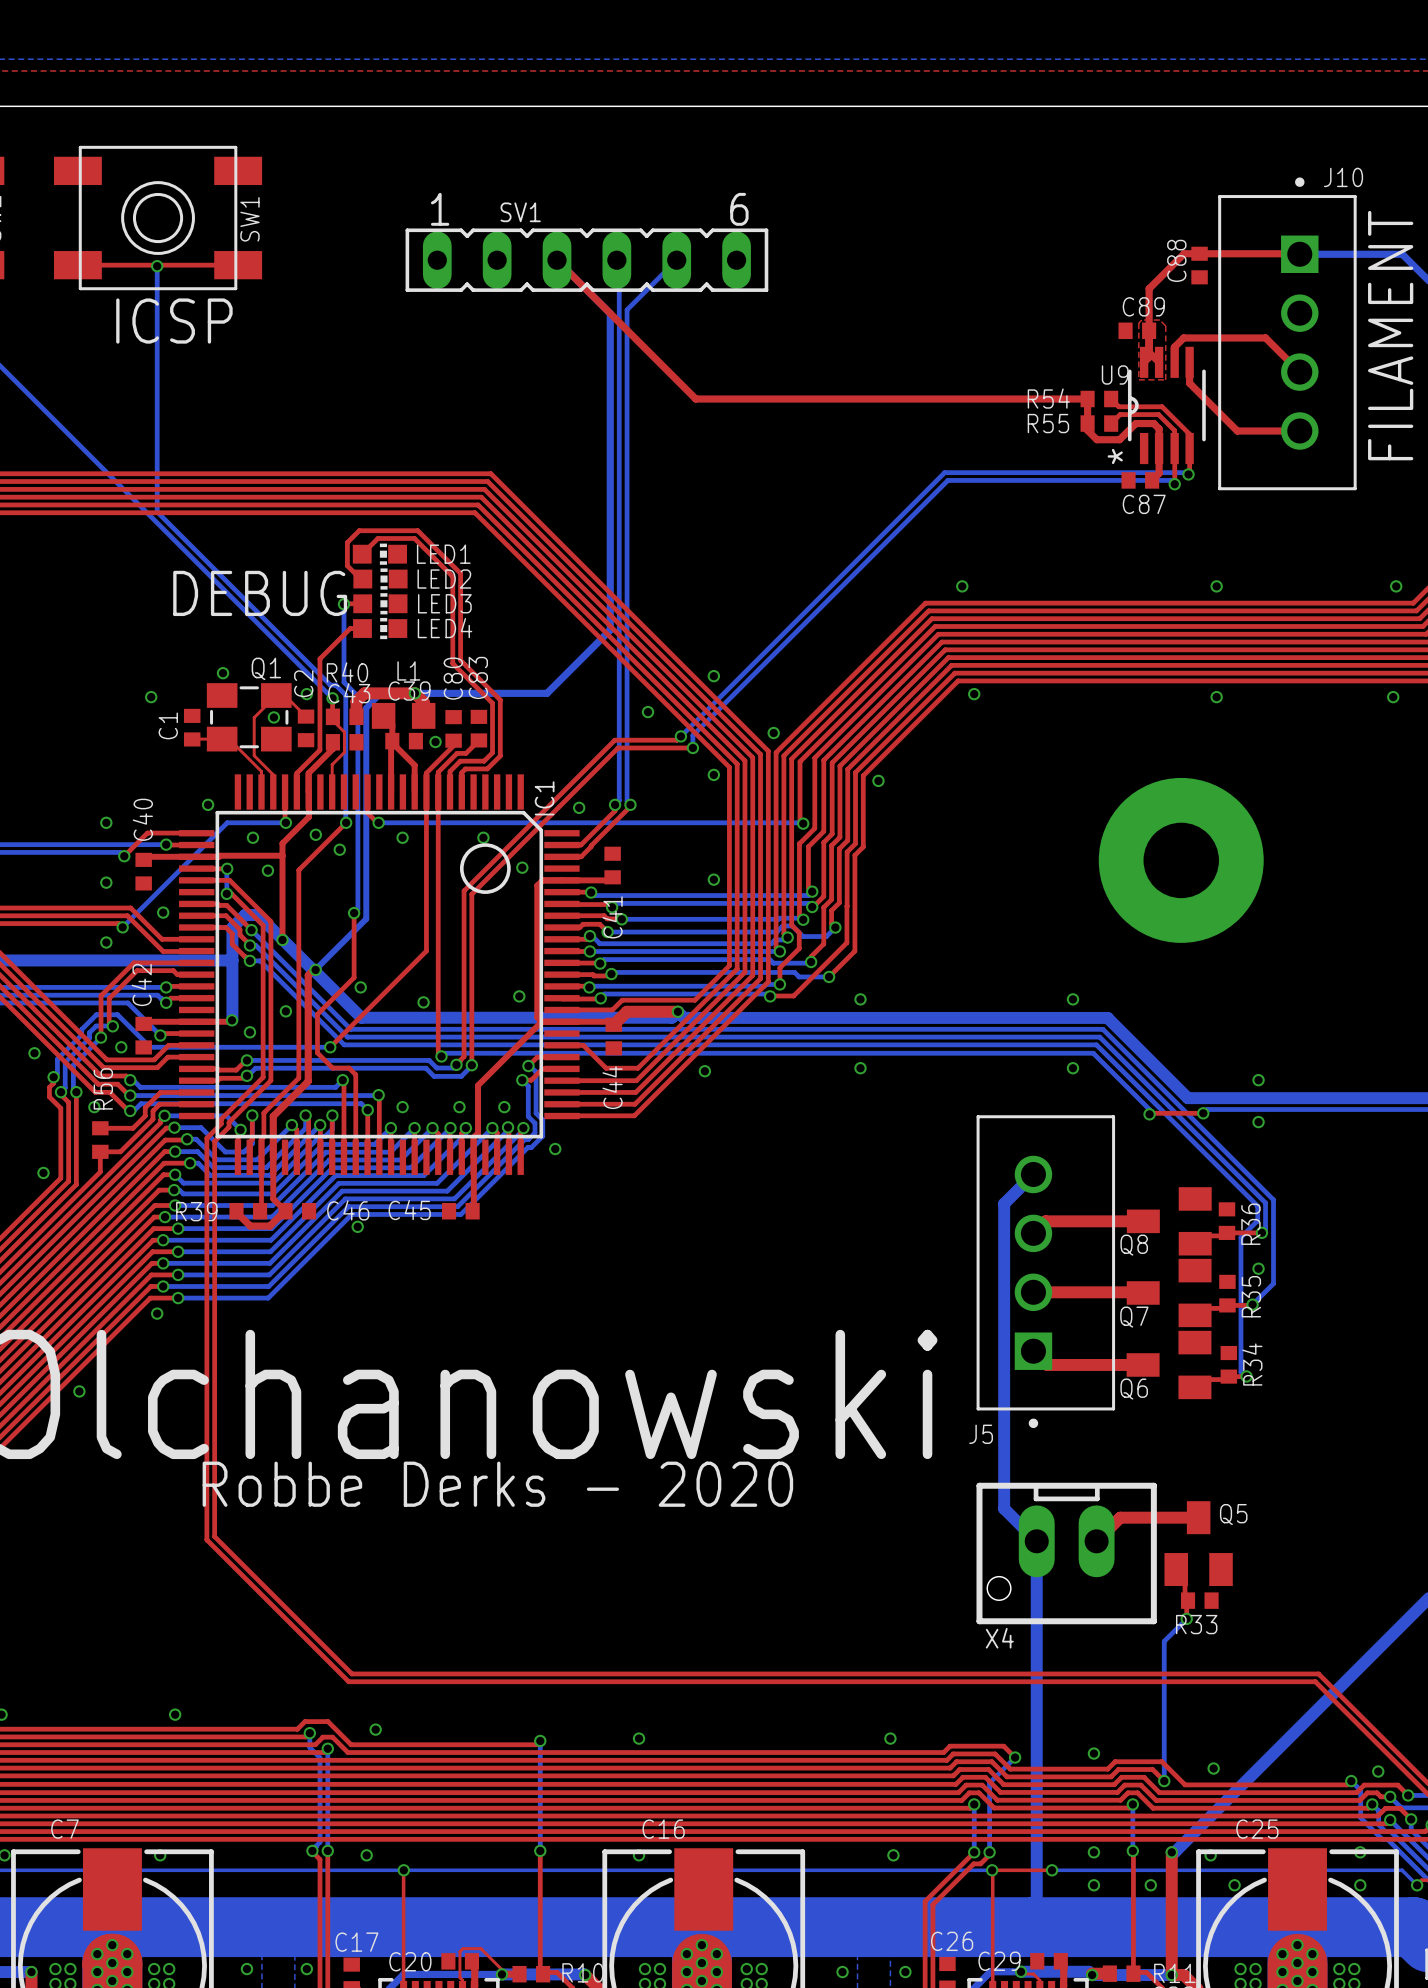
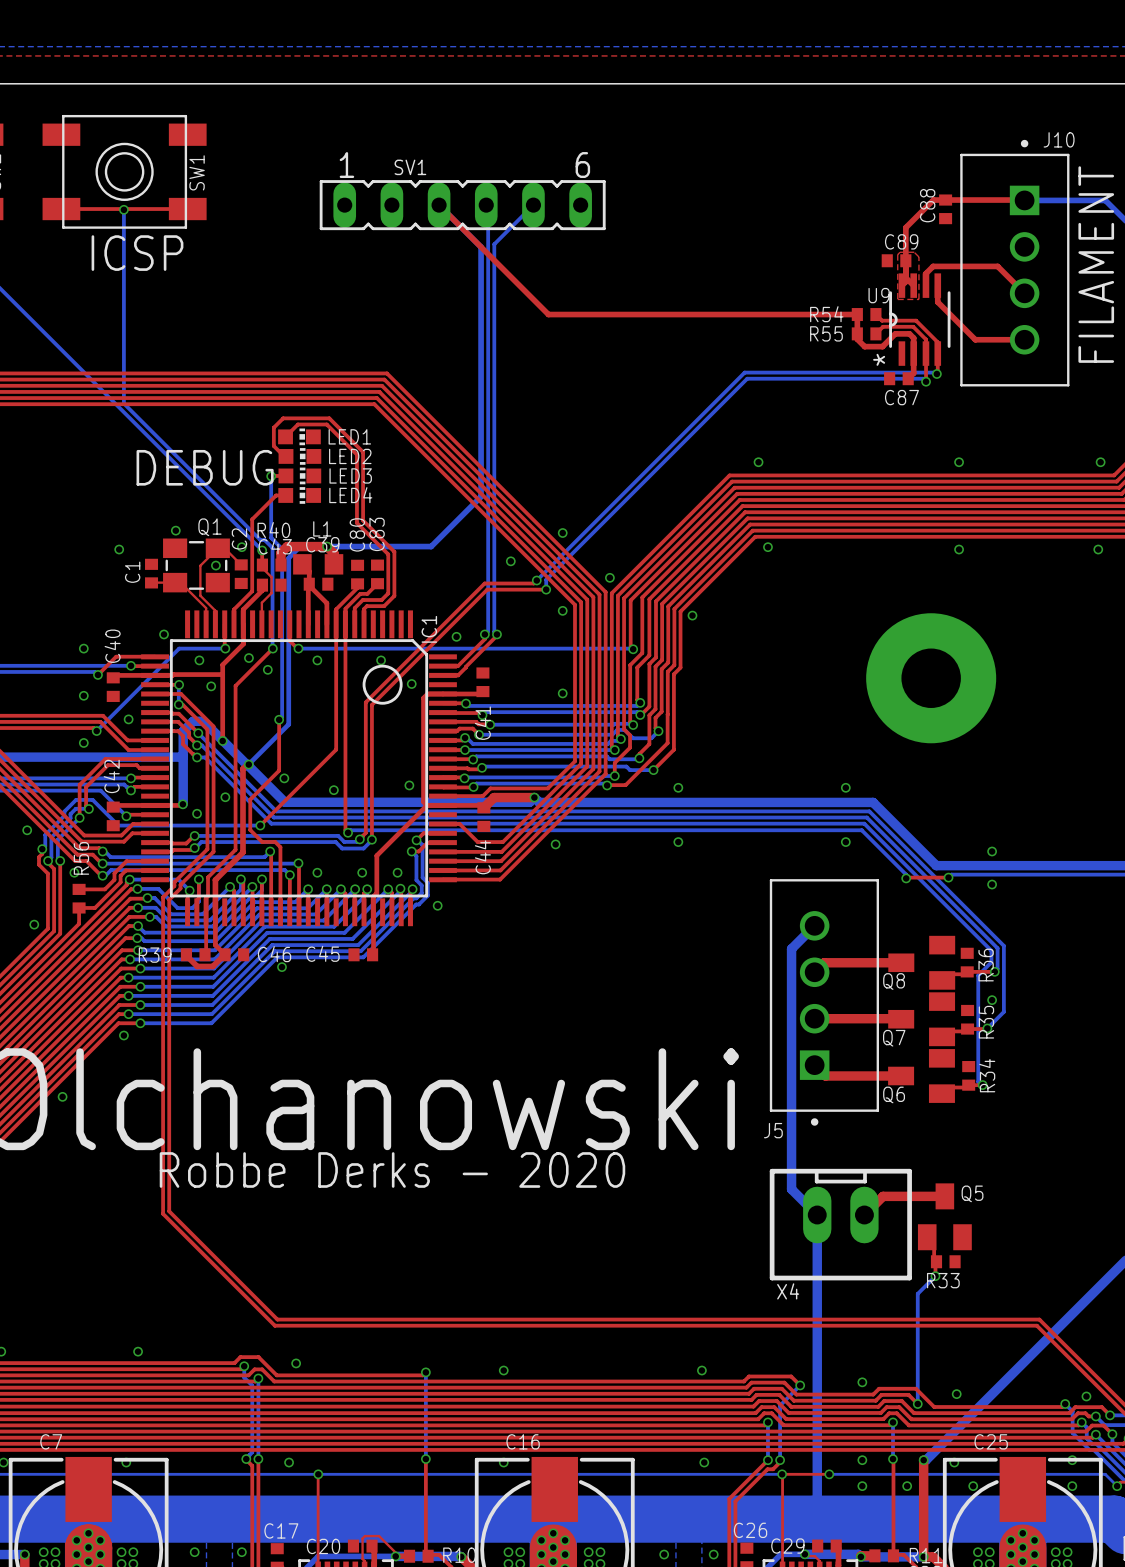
via: (435, 742) -> none
via: (121, 1047) -> none
X4 footprint: [976, 1482, 1157, 1625] -> [769, 1168, 912, 1281]

